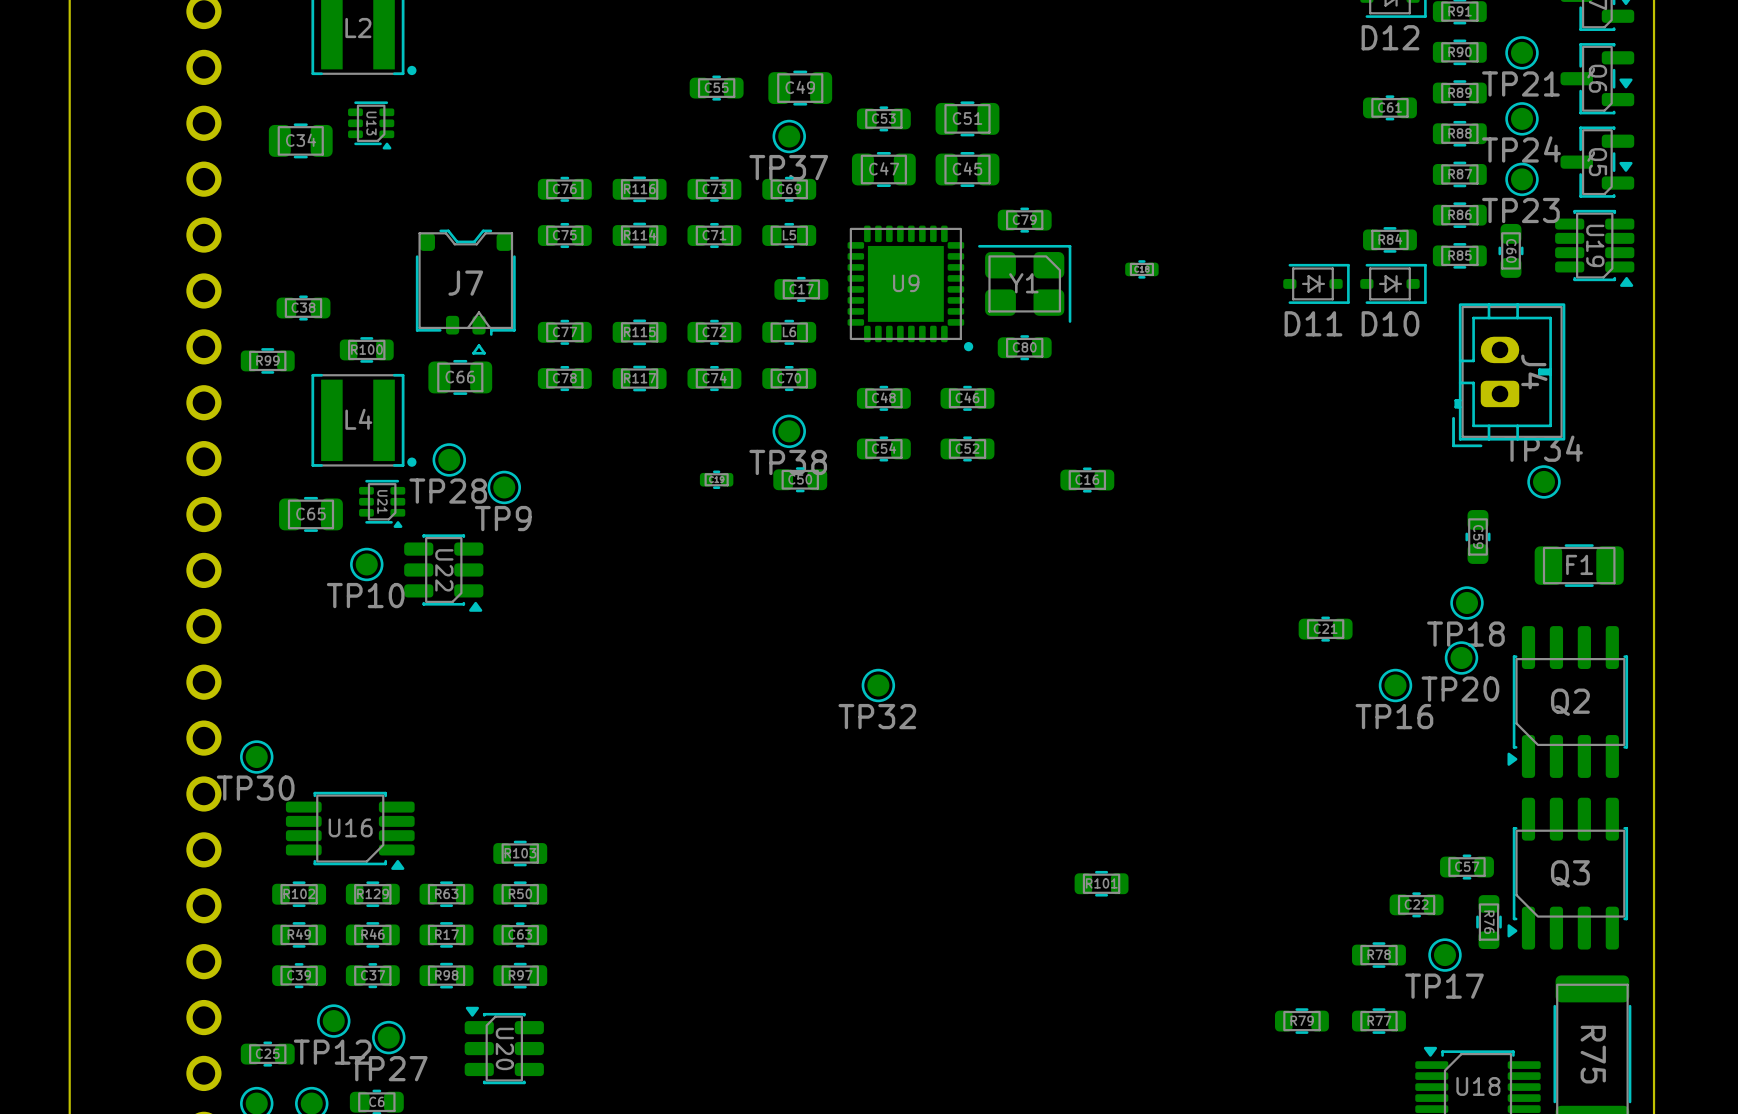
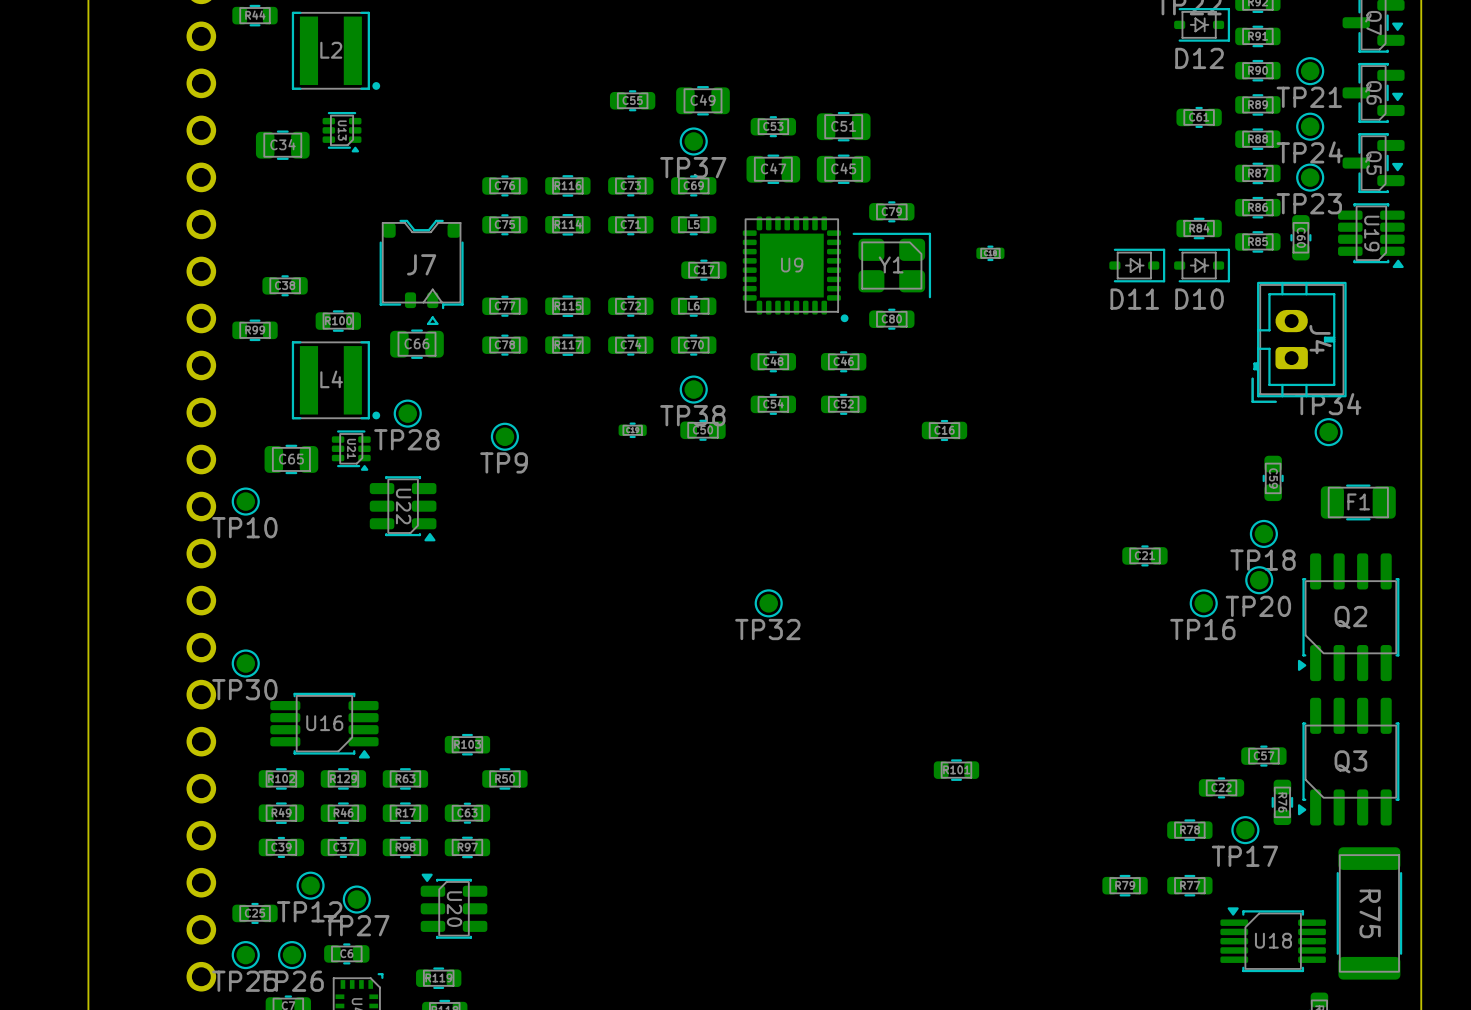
TP9 position: (504, 487) -> (504, 436)
TP10 position: (366, 564) -> (245, 501)
R50 position: (520, 894) -> (504, 778)

